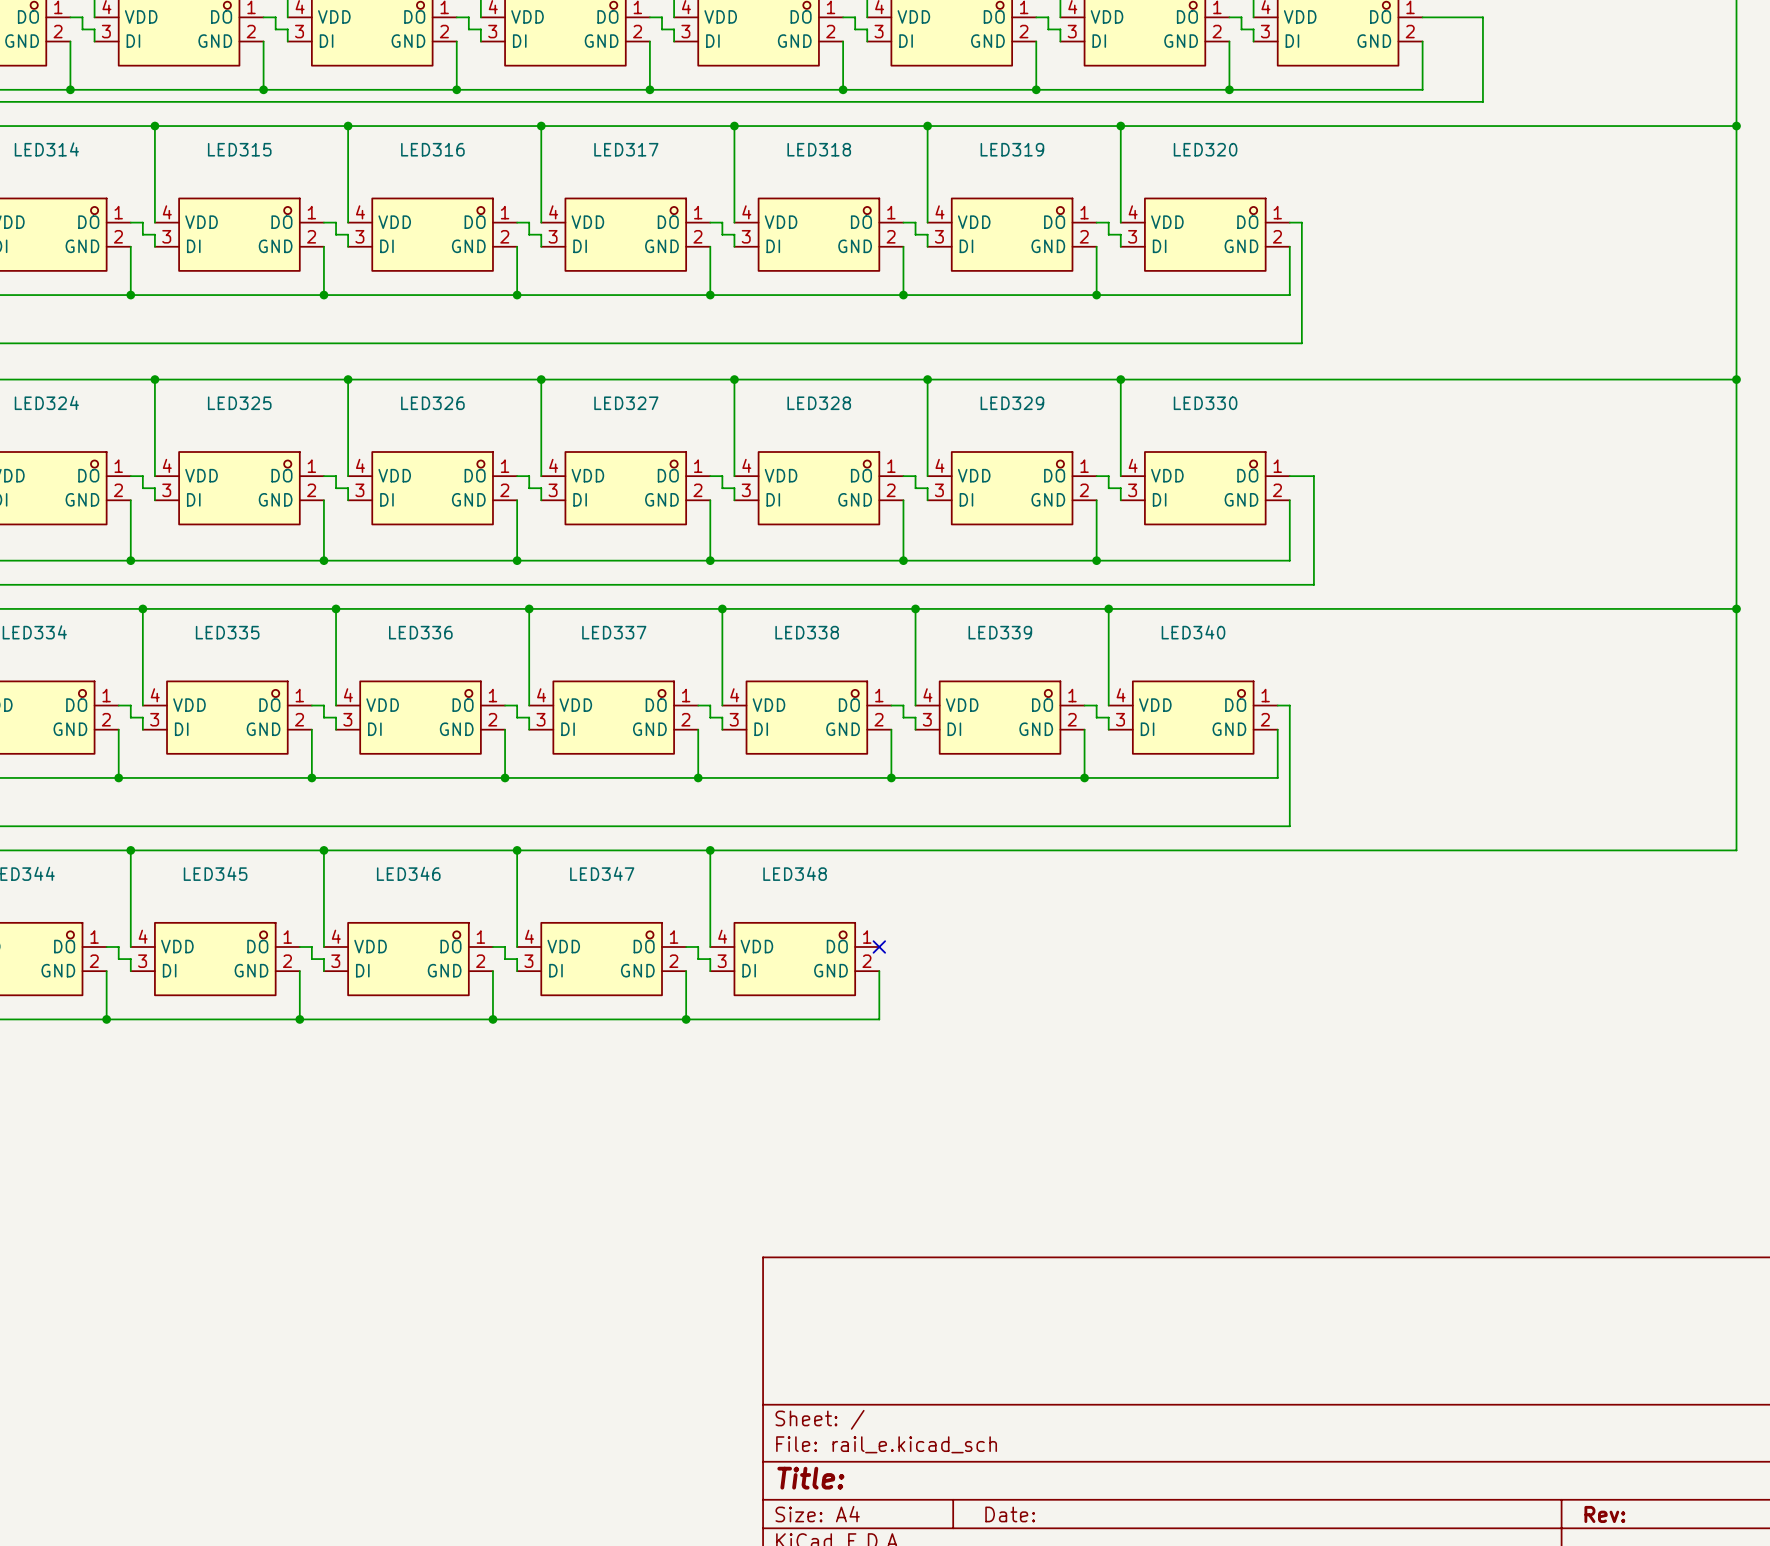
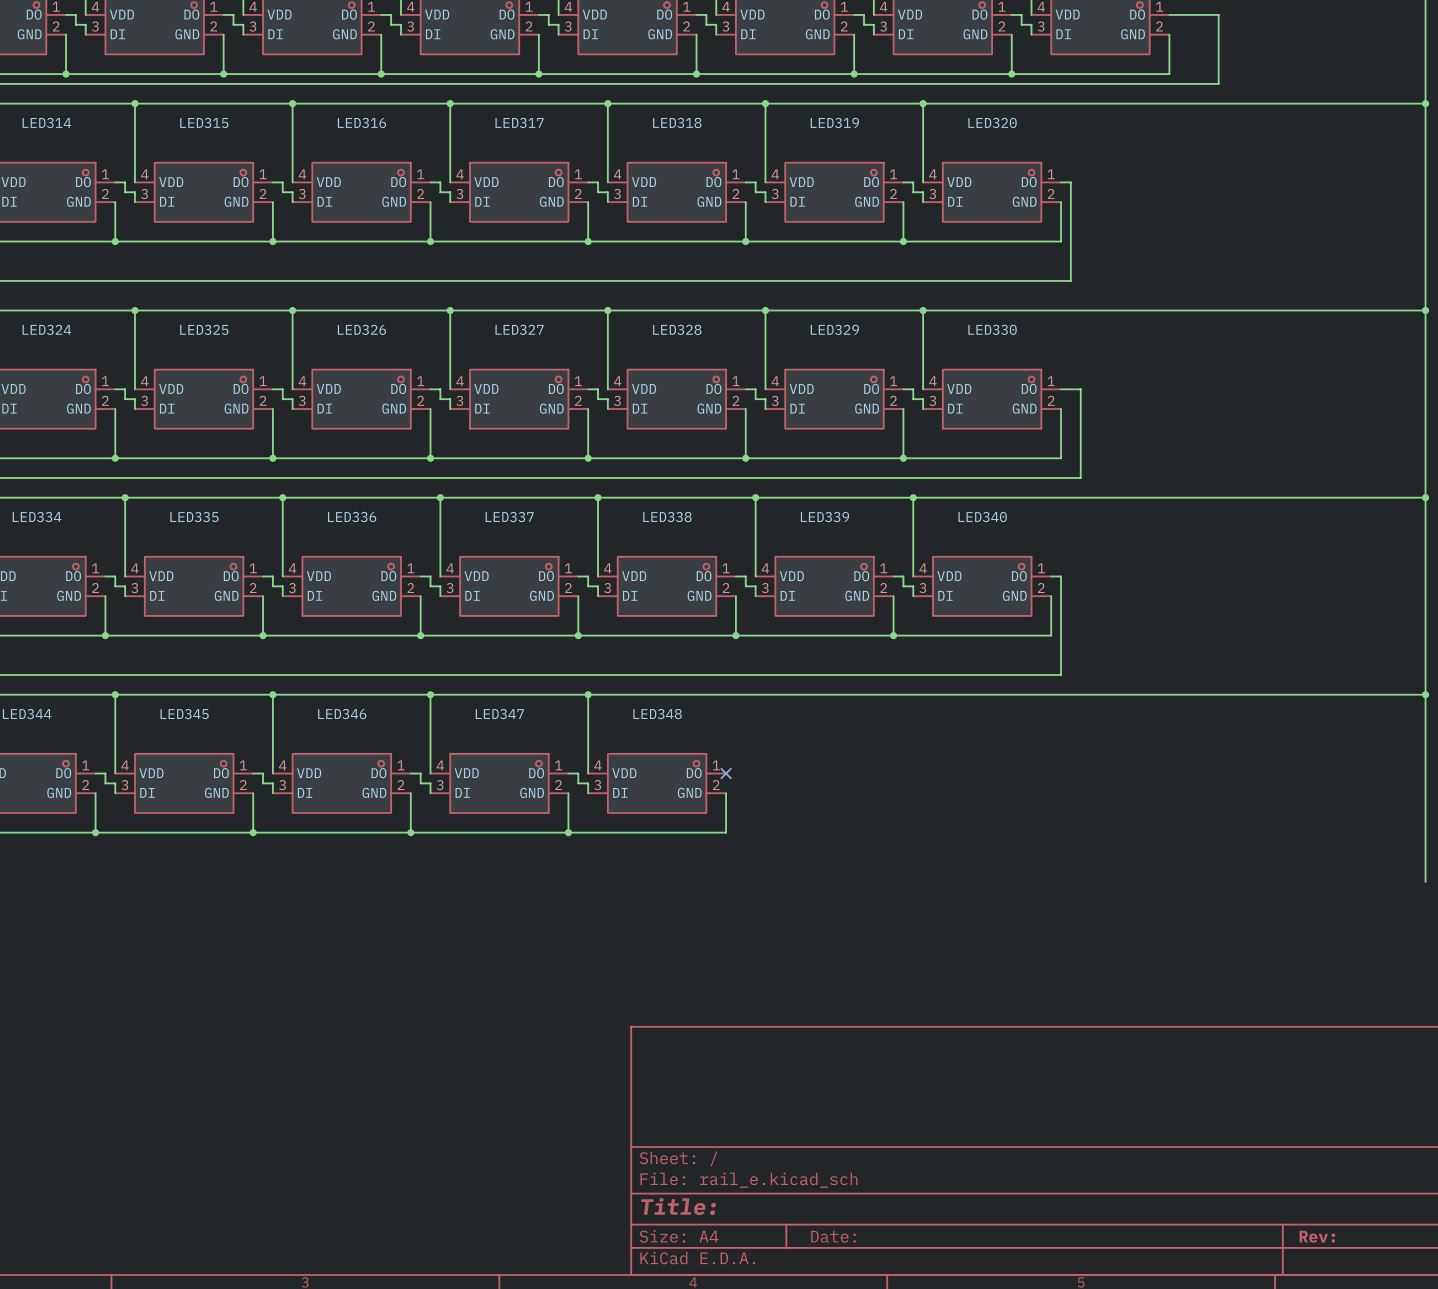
wire: none -> (1425, 694) (1425, 881)
junction: none -> (1425, 694)

